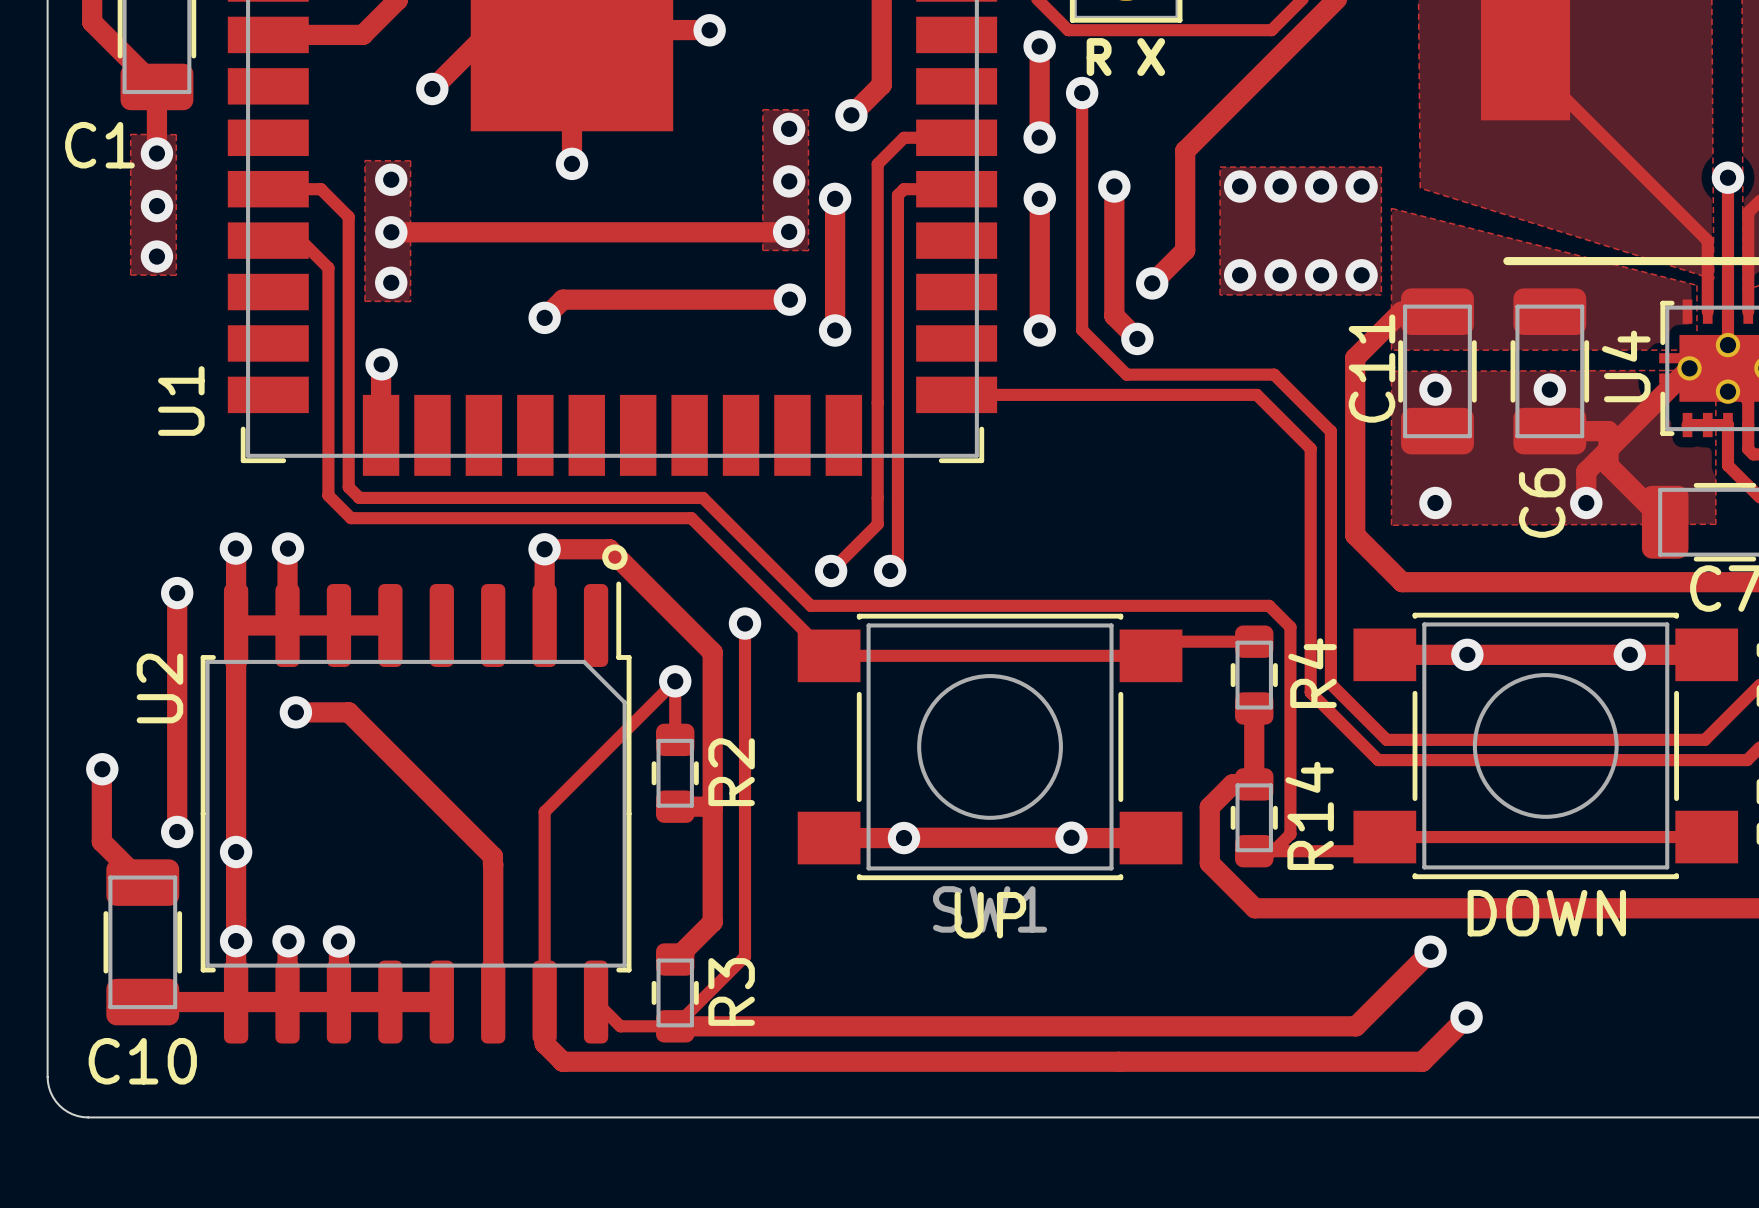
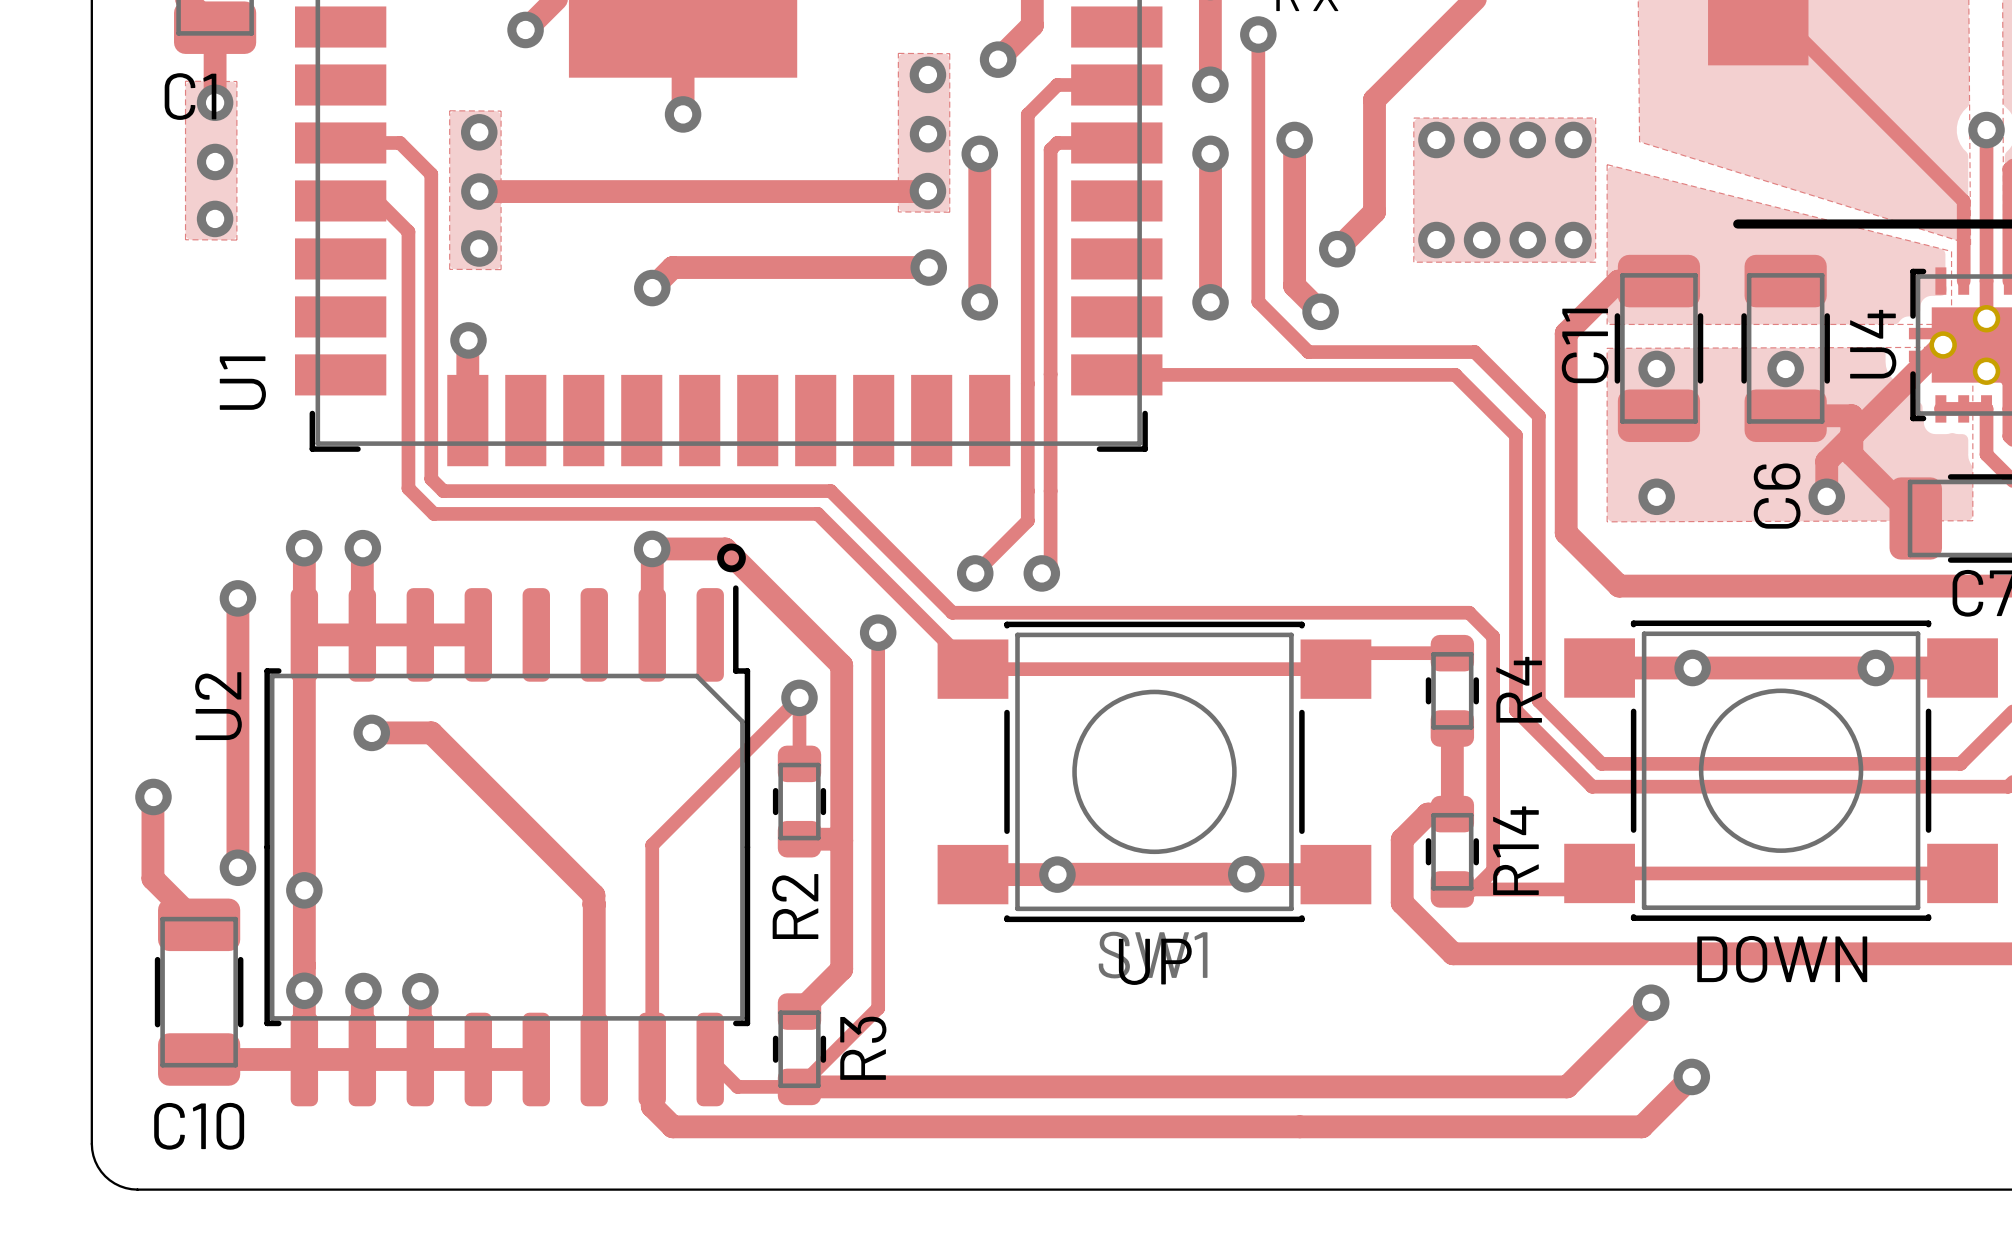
C1 name position: C1 (99, 145) -> C1 (190, 96)
R2 name position: R2 (731, 772) -> R2 (795, 906)

